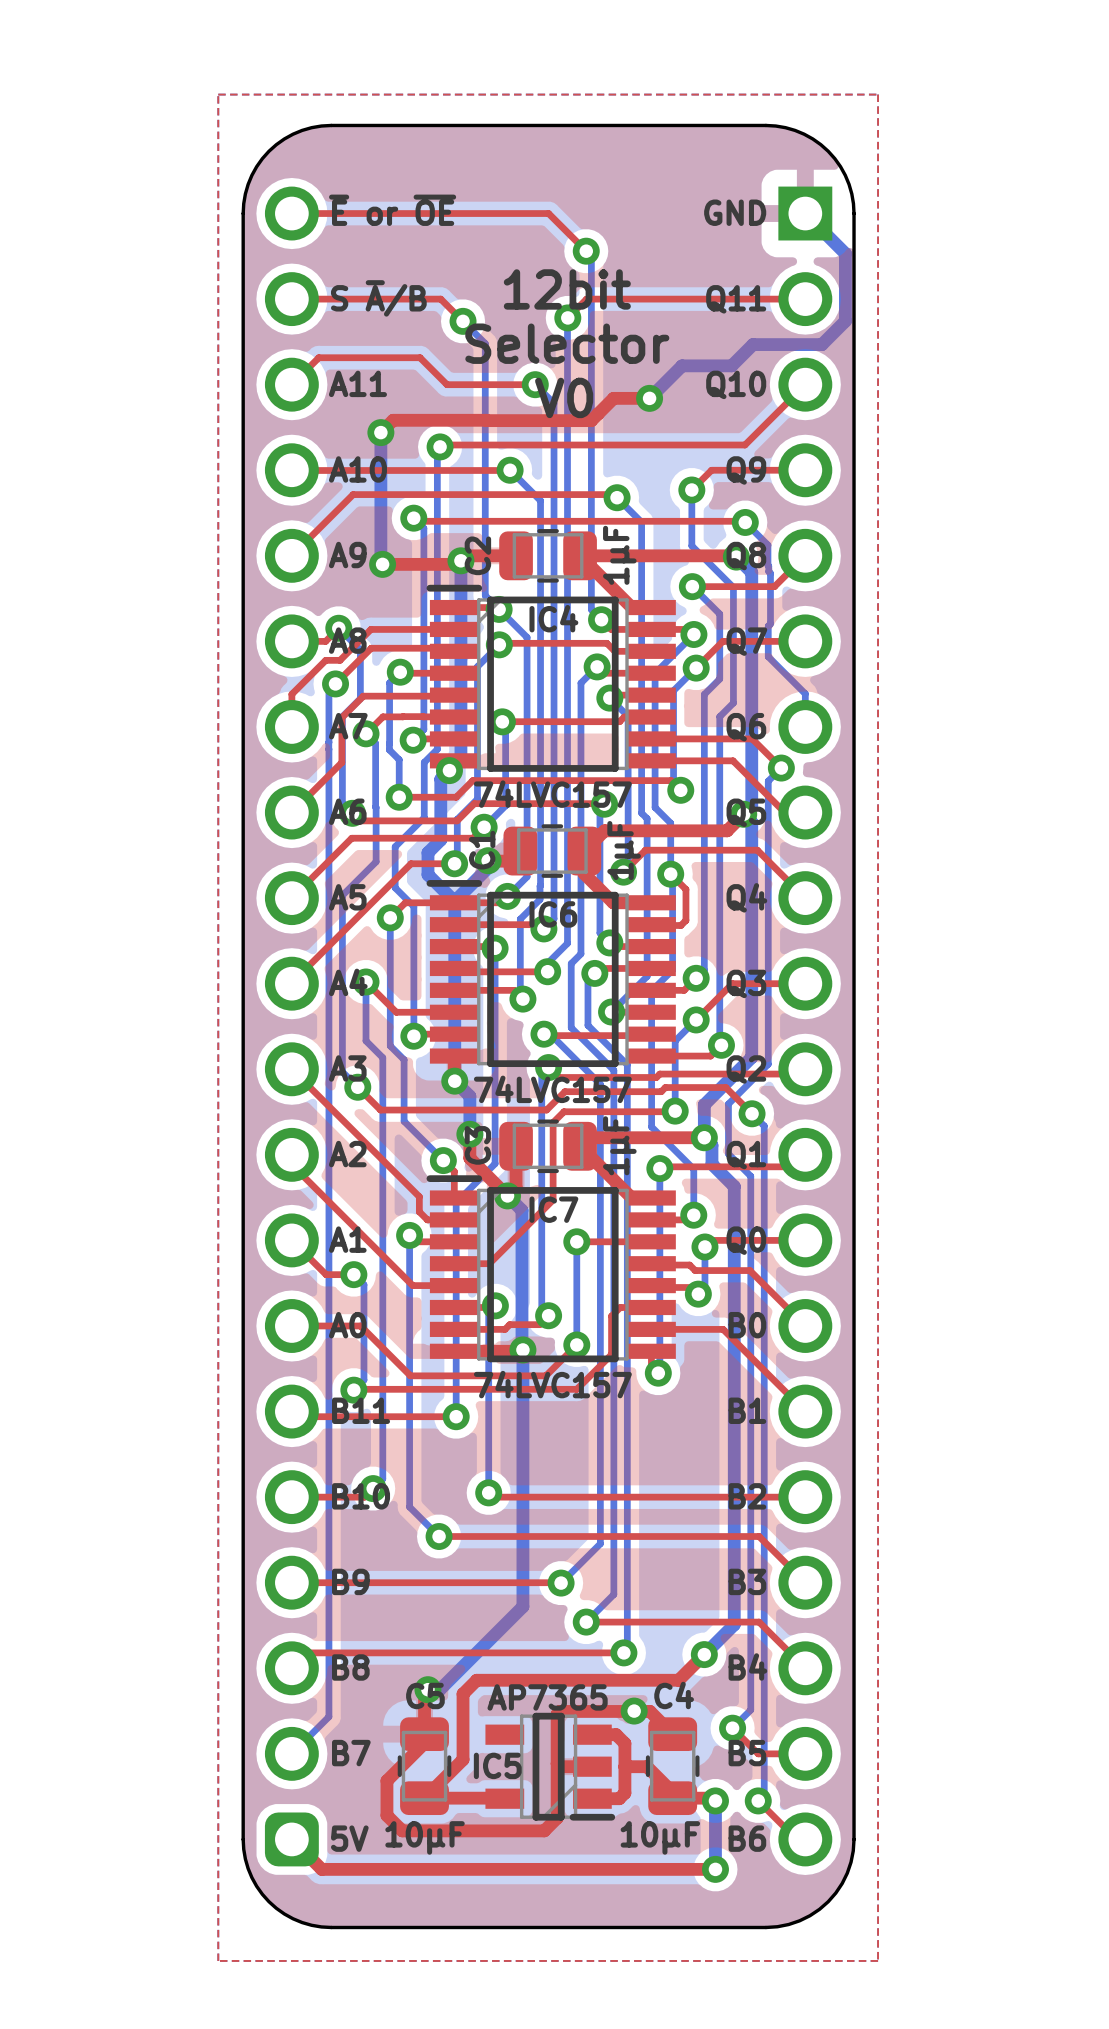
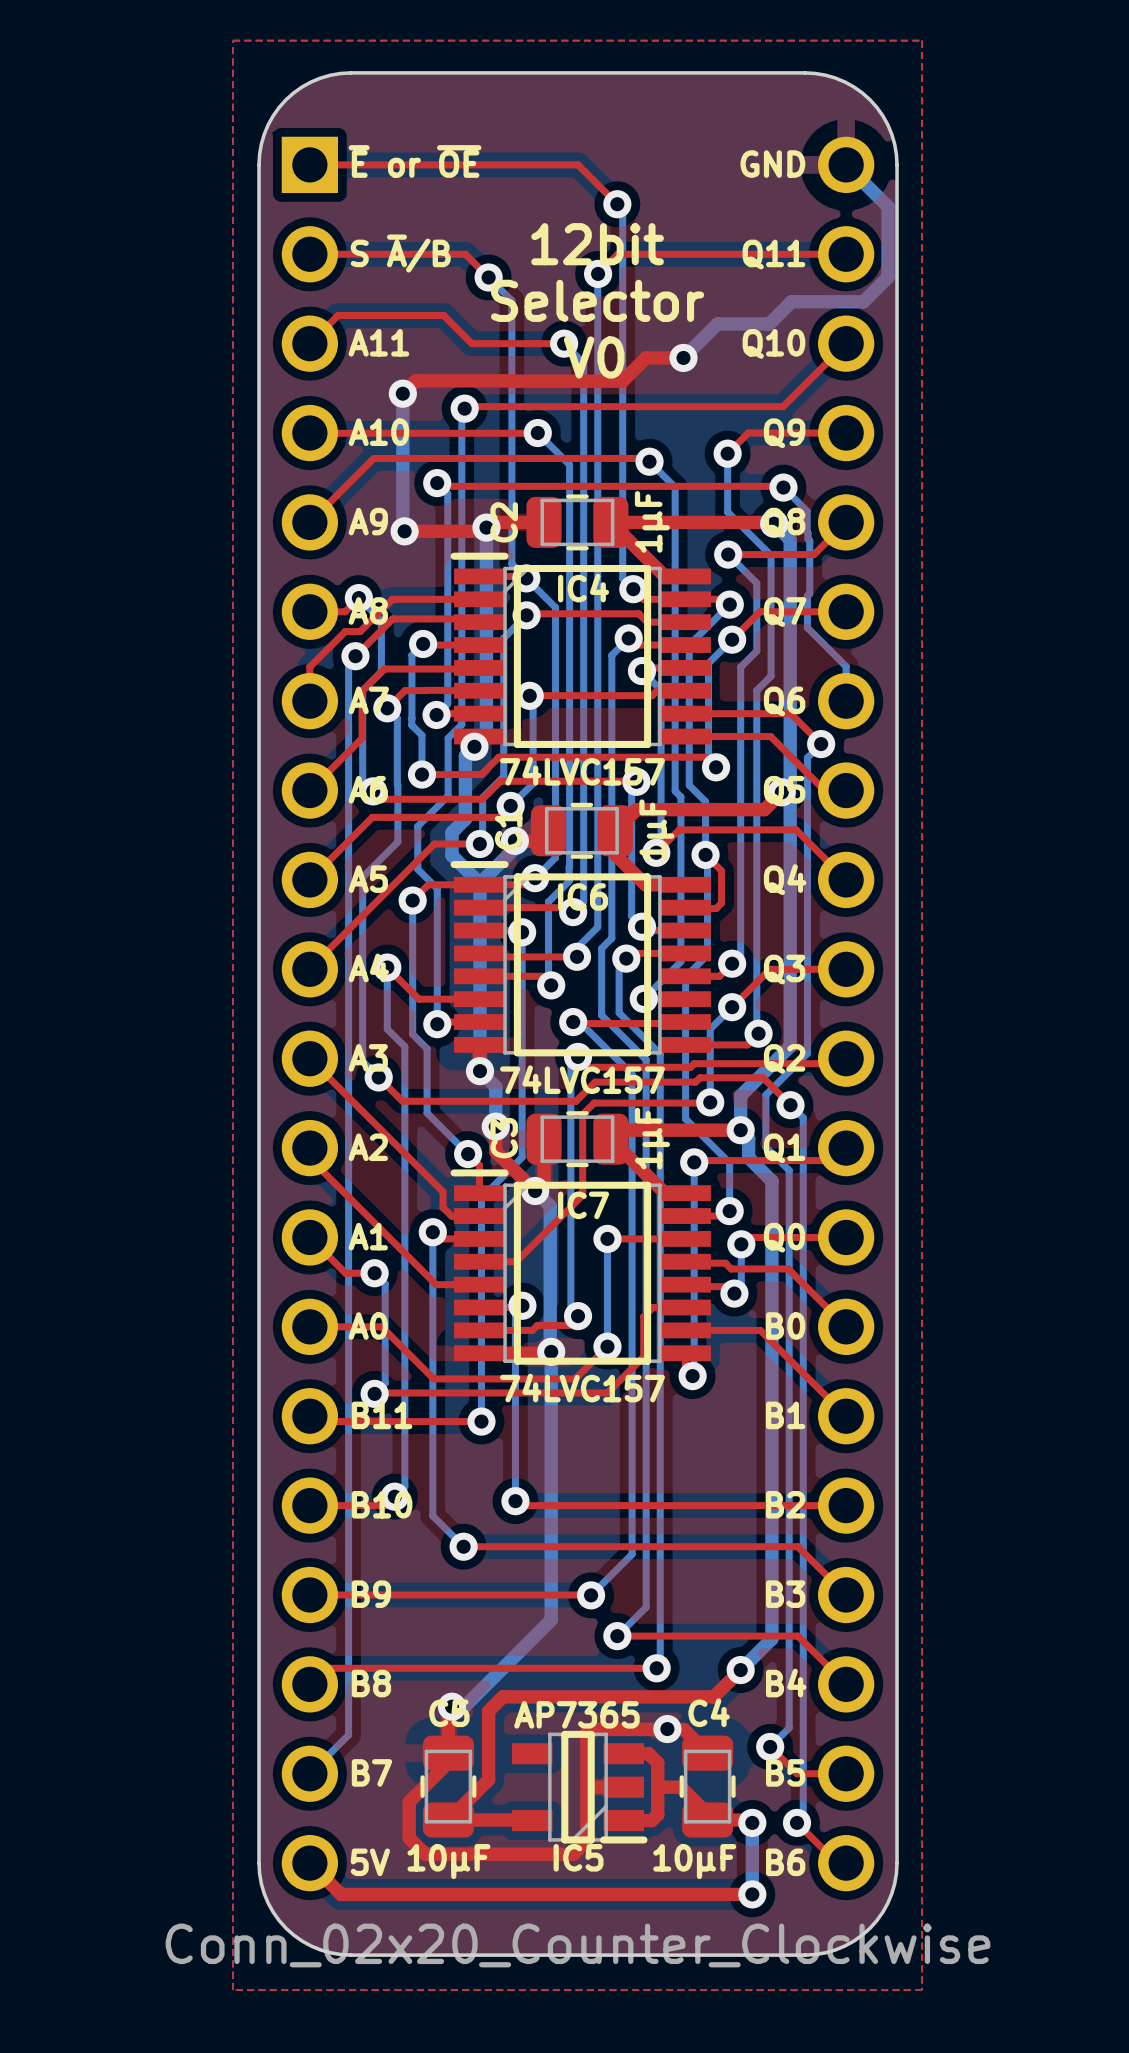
part footprint: [241, 123, 856, 1930] -> [281, 136, 875, 1892]
board edge: none -> (350, 72) (815, 73) (835, 78) (862, 92) (882, 115) (894, 144) (897, 164) (897, 1863) (891, 1893) (876, 1920) (853, 1941) (825, 1952) (805, 1955) (340, 1954) (311, 1946) (293, 1935) (273, 1912) (261, 1883) (259, 1863) (259, 164) (261, 144) (268, 124) (285, 99) (302, 87) (320, 78) (350, 72)
IC5 name position: IC5 (497, 1765) -> IC5 (578, 1857)
part value: none -> Conn_02x20_Counter_Clockwise (578, 1945)

